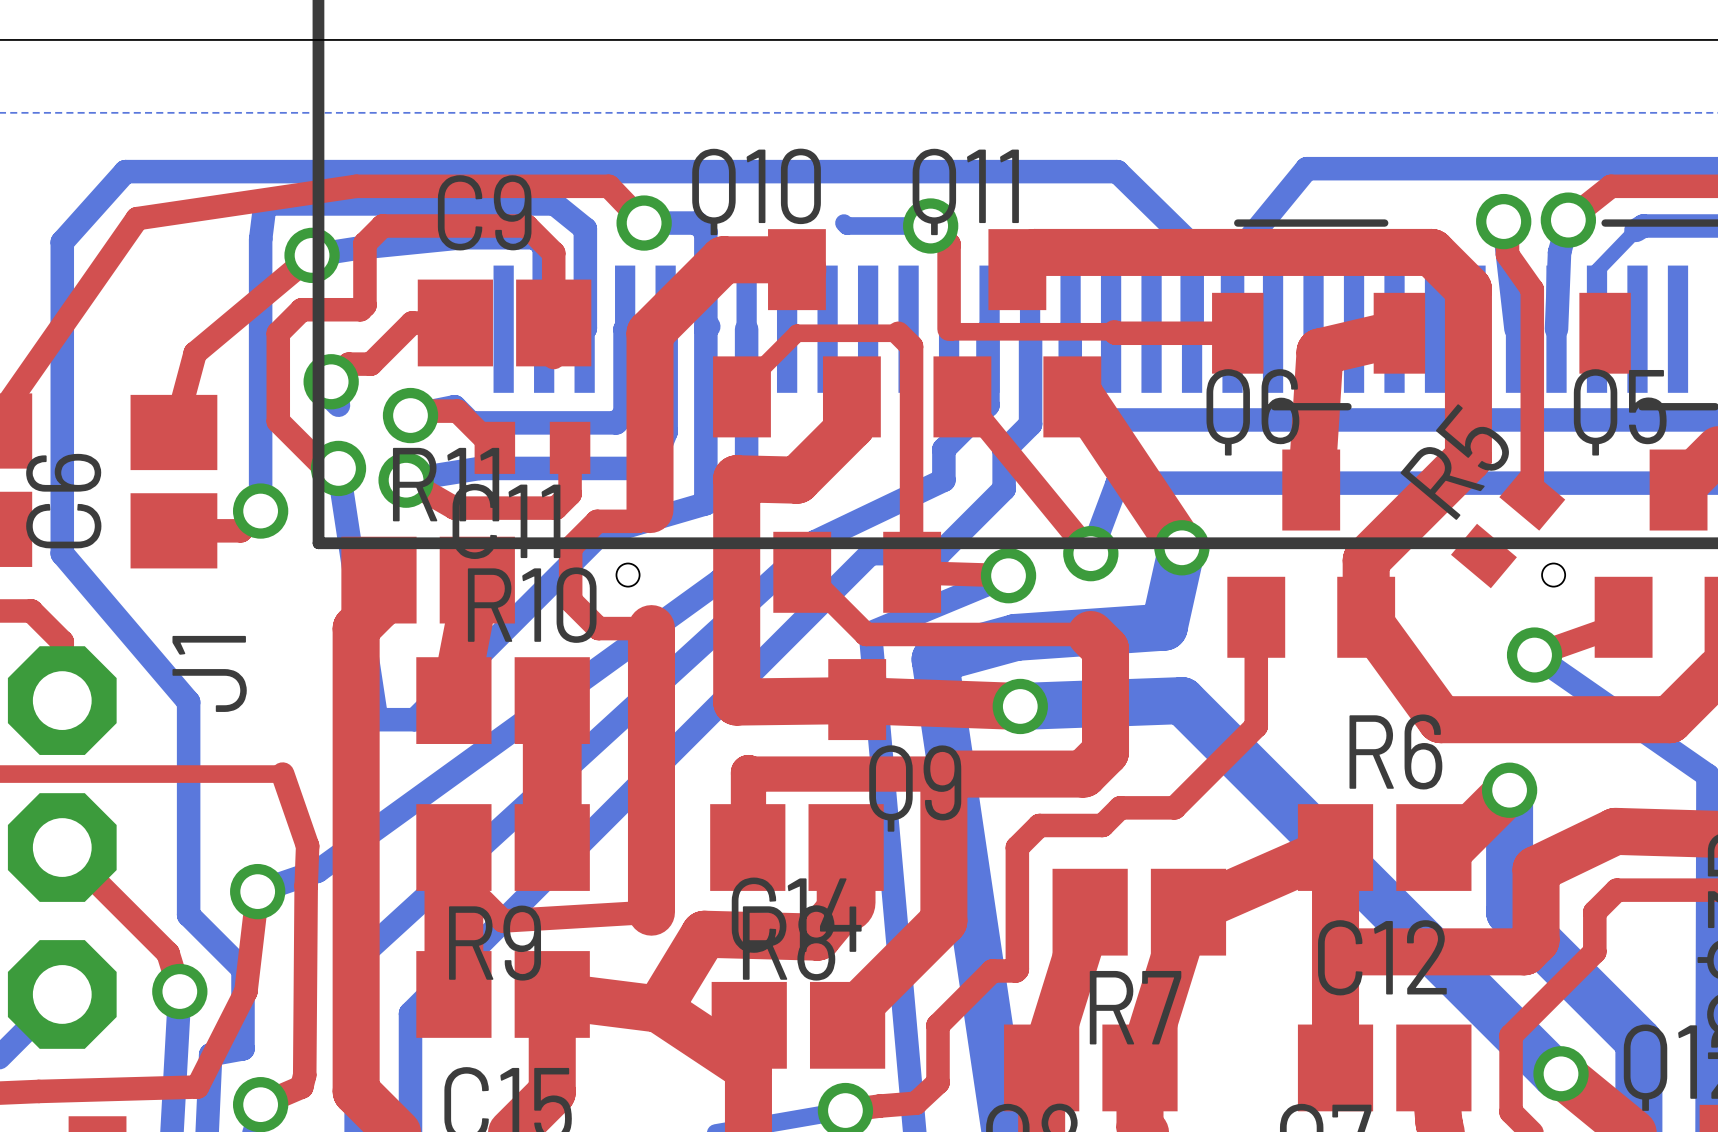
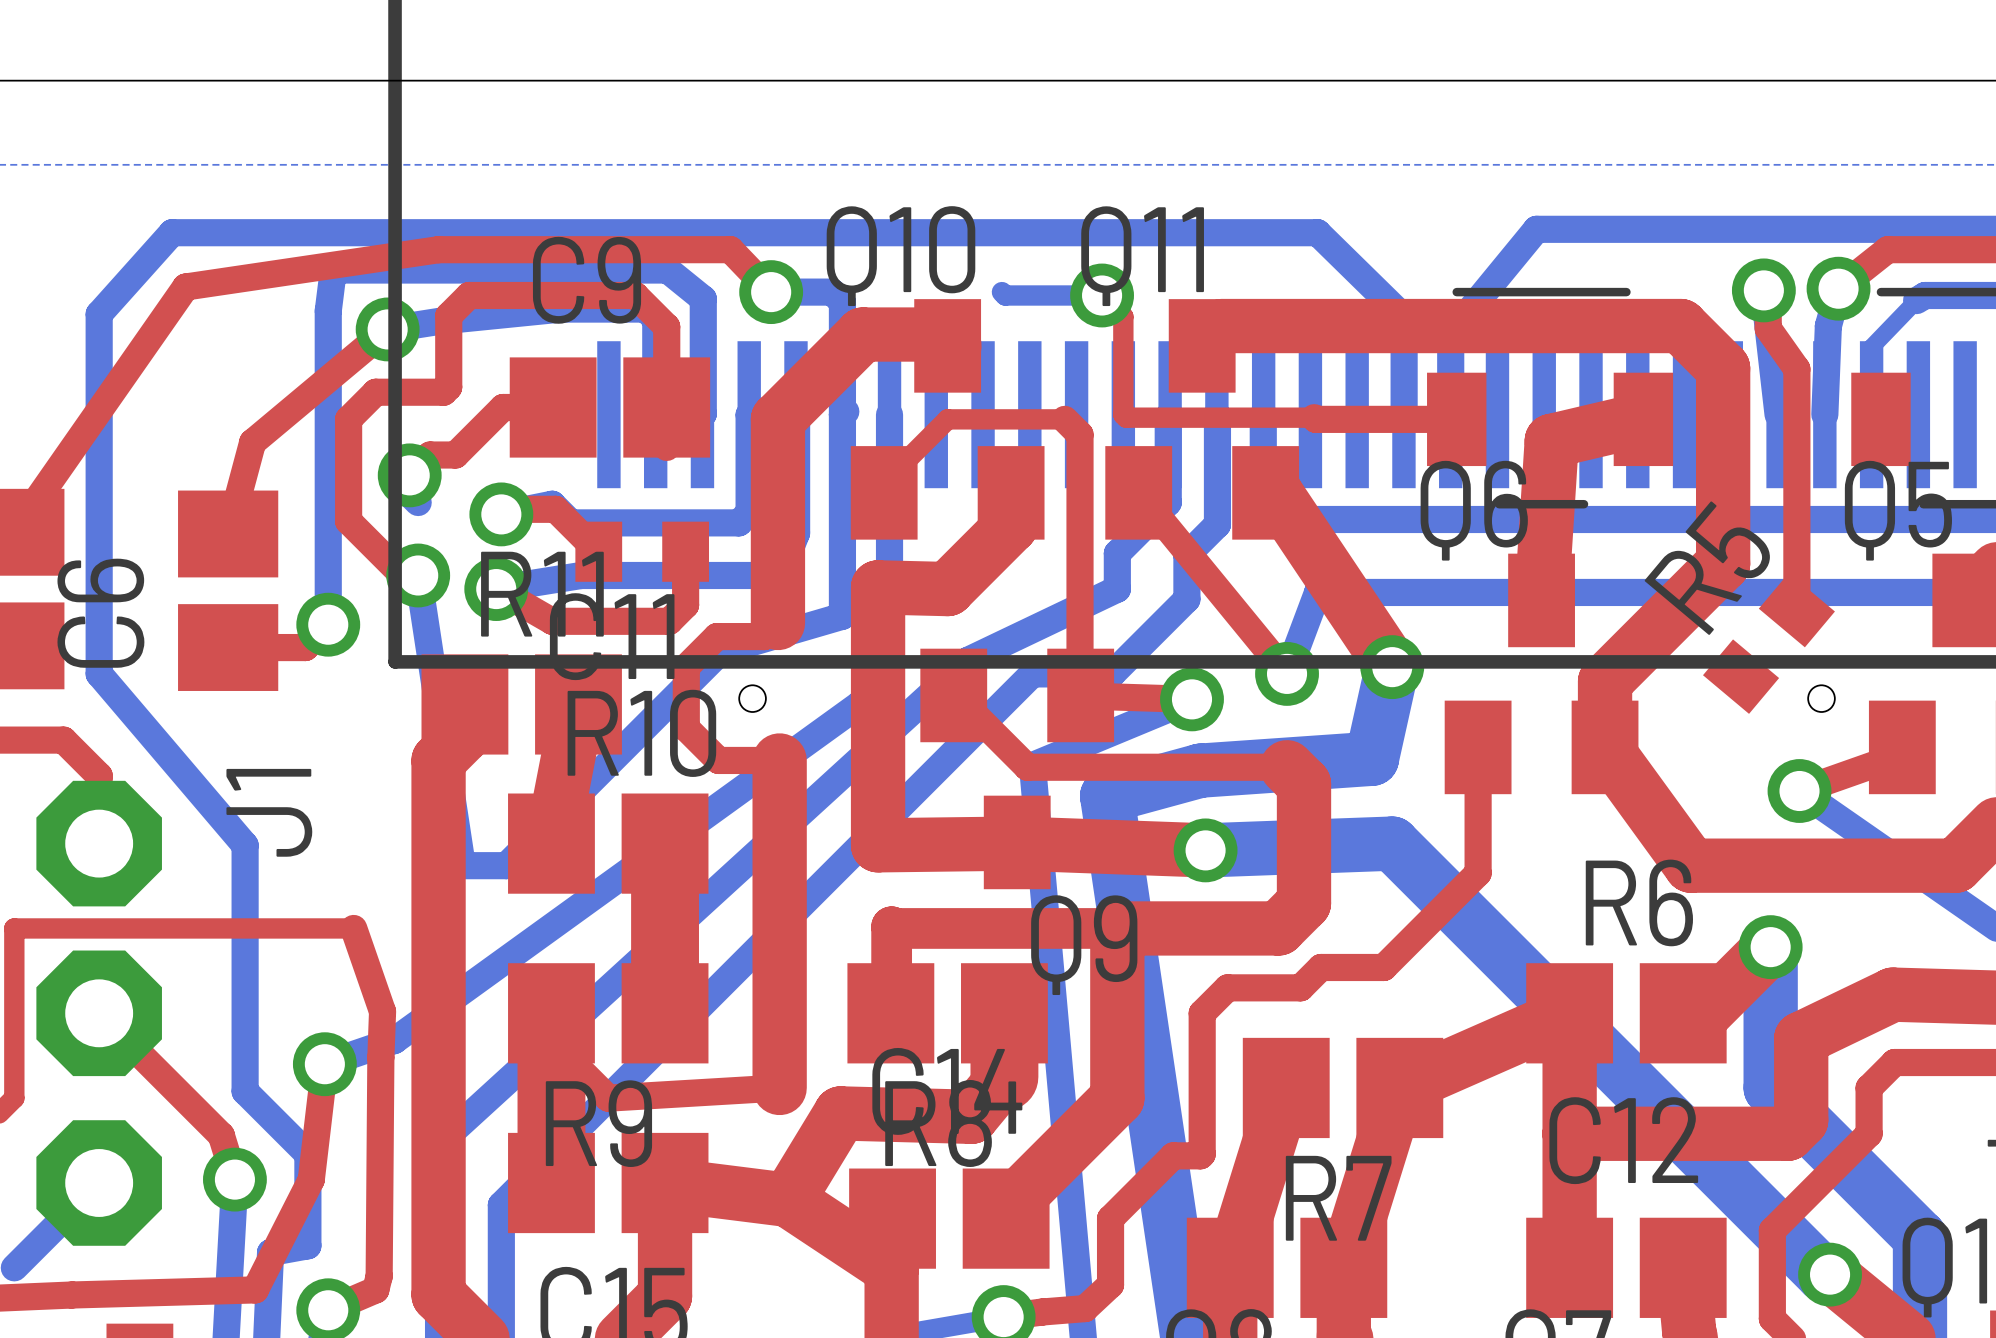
top track width: thick (930, 225) (949, 244) (949, 329) -> thin (1102, 295) (1123, 316) (1123, 414)

